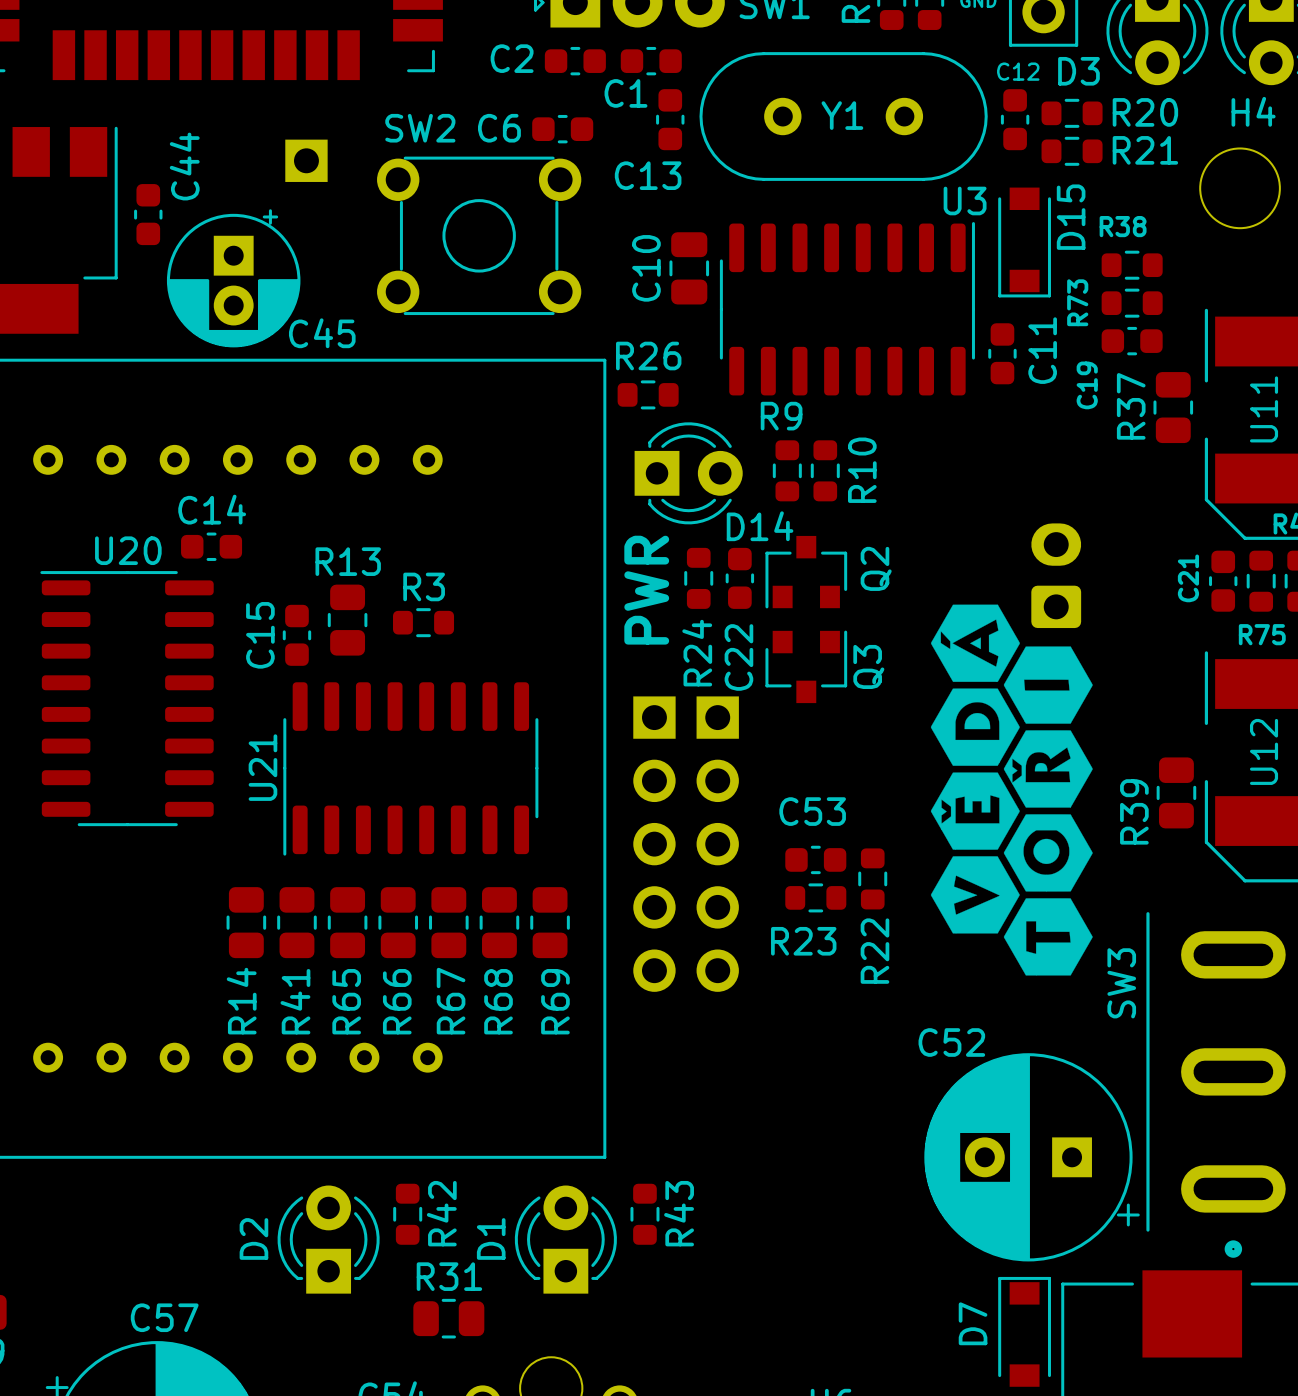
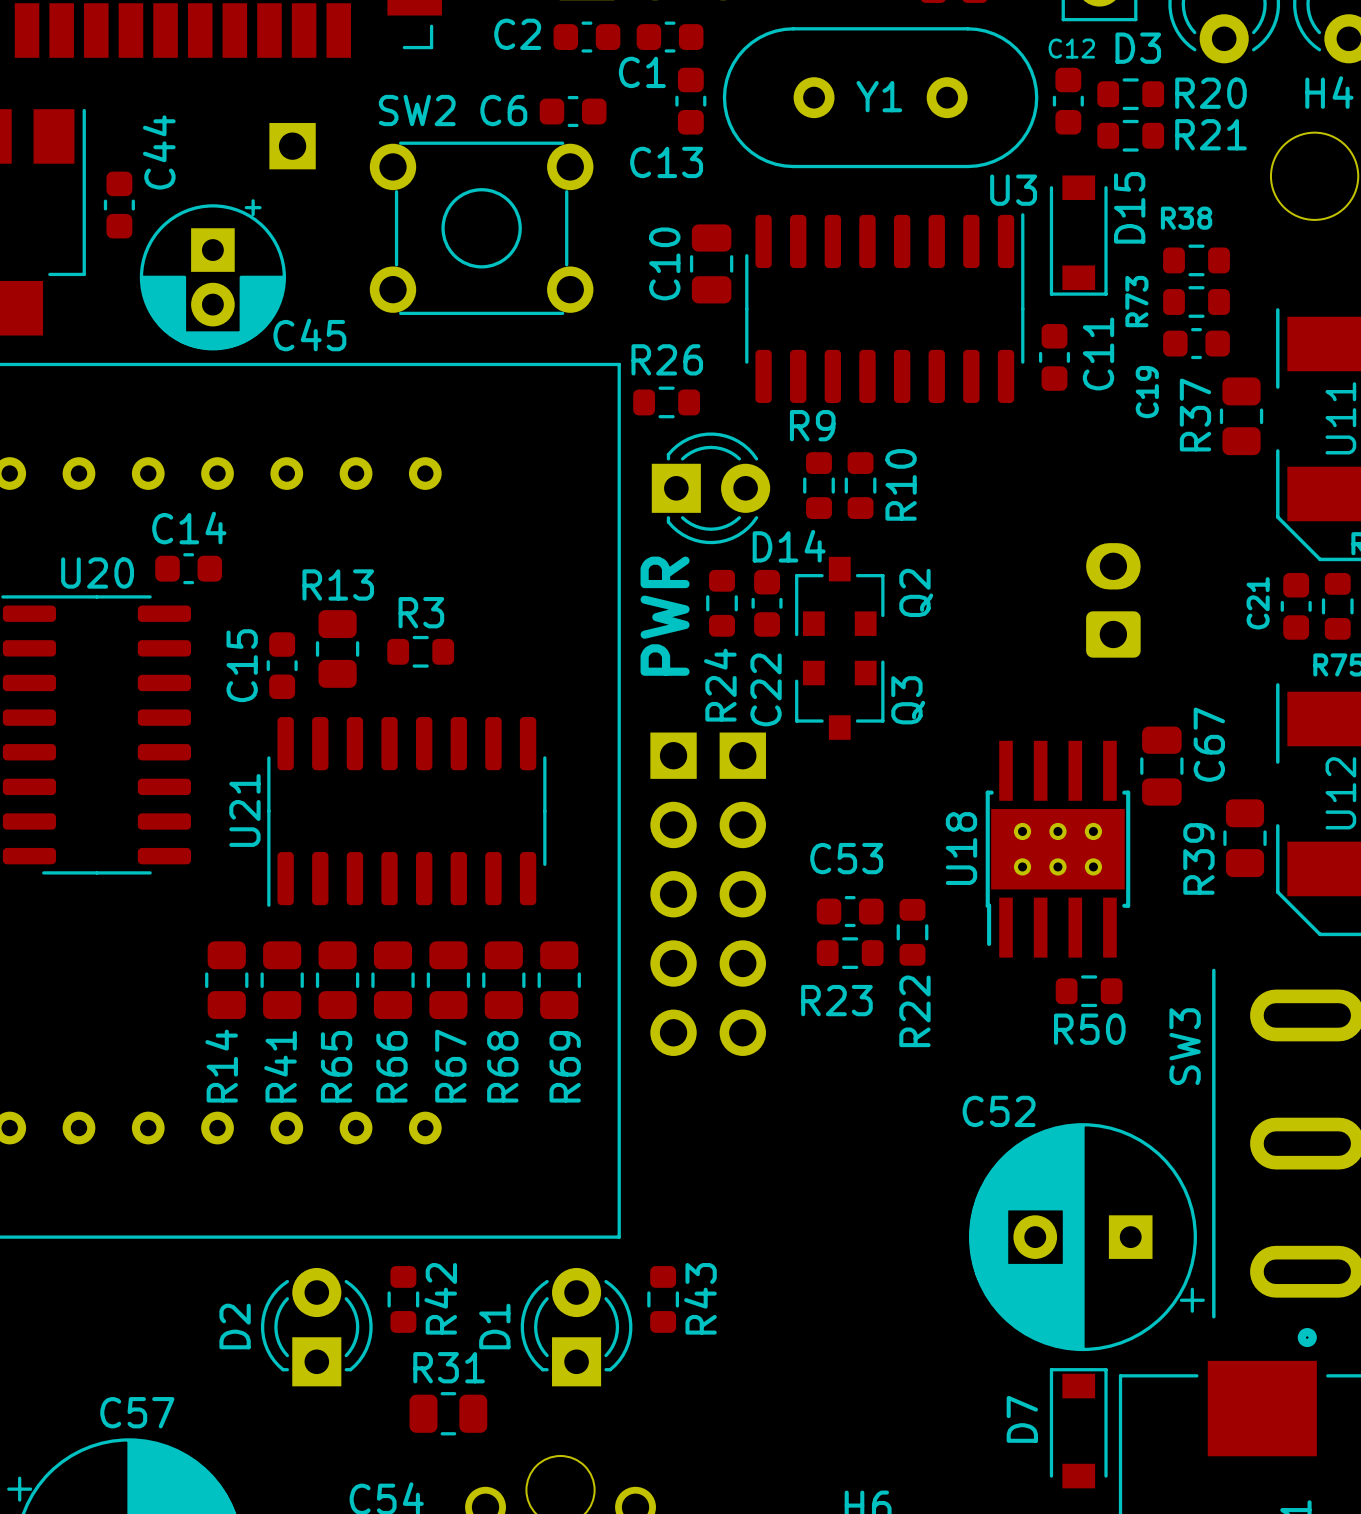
drawing: [930, 604, 1093, 976] -> none
C67: none -> (1161, 766)
U18: none -> (1057, 849)
R50: none -> (1089, 991)

